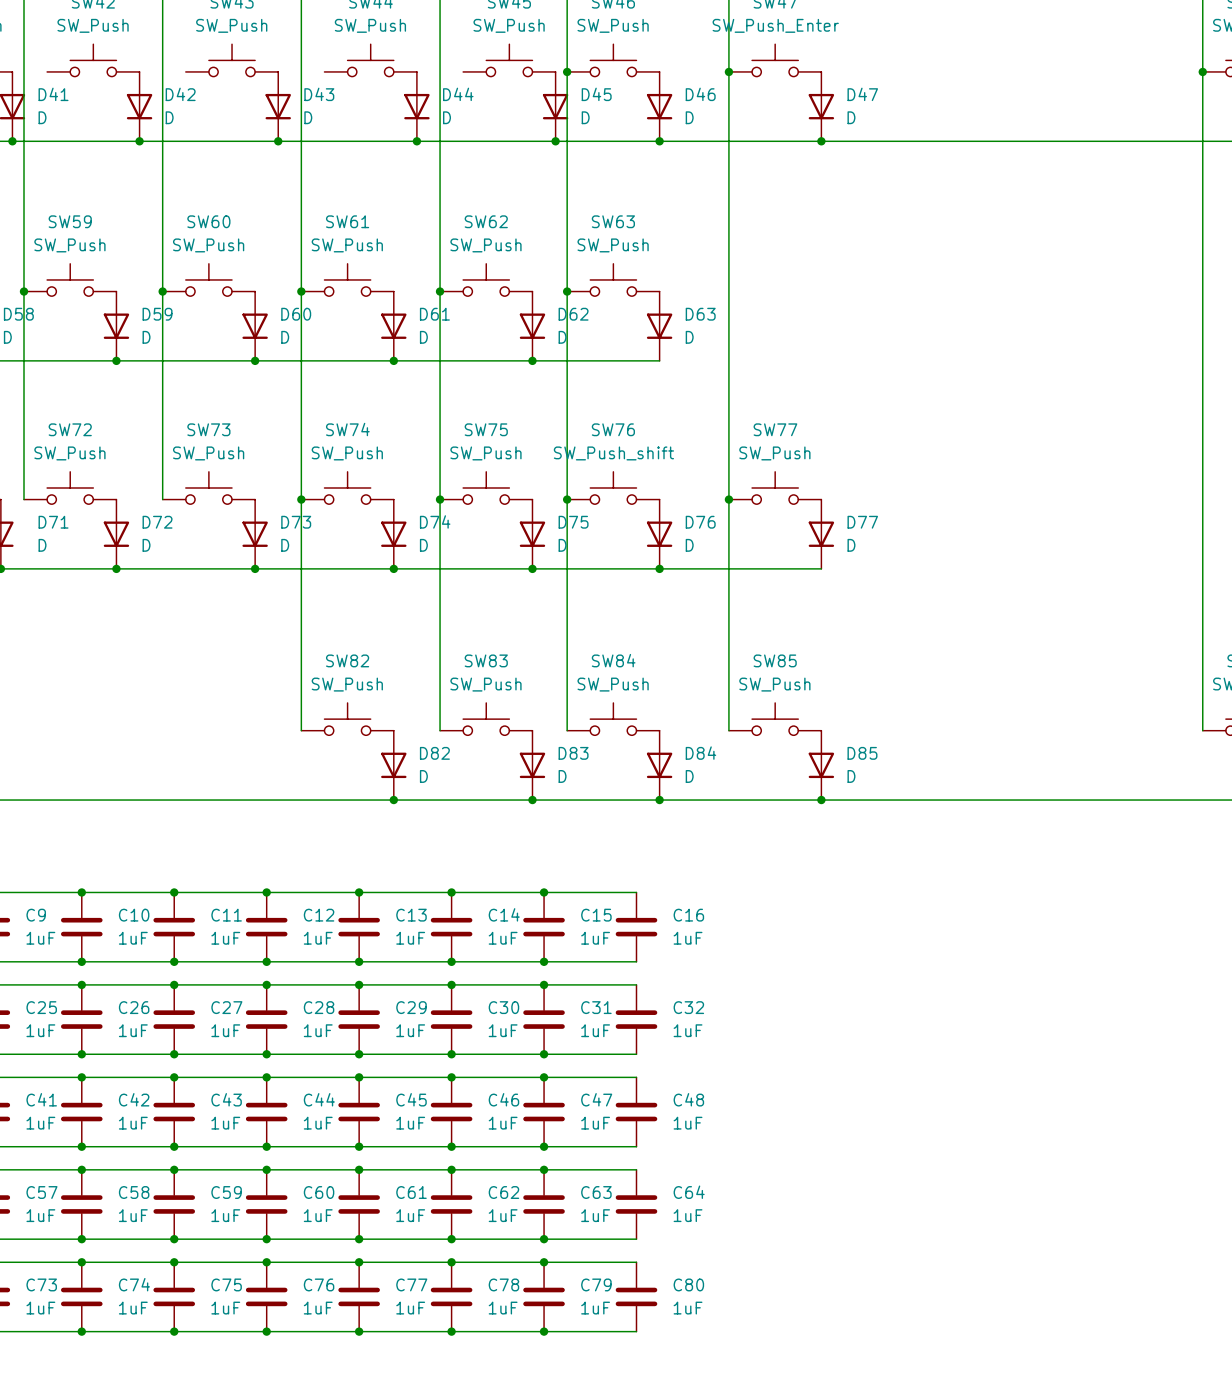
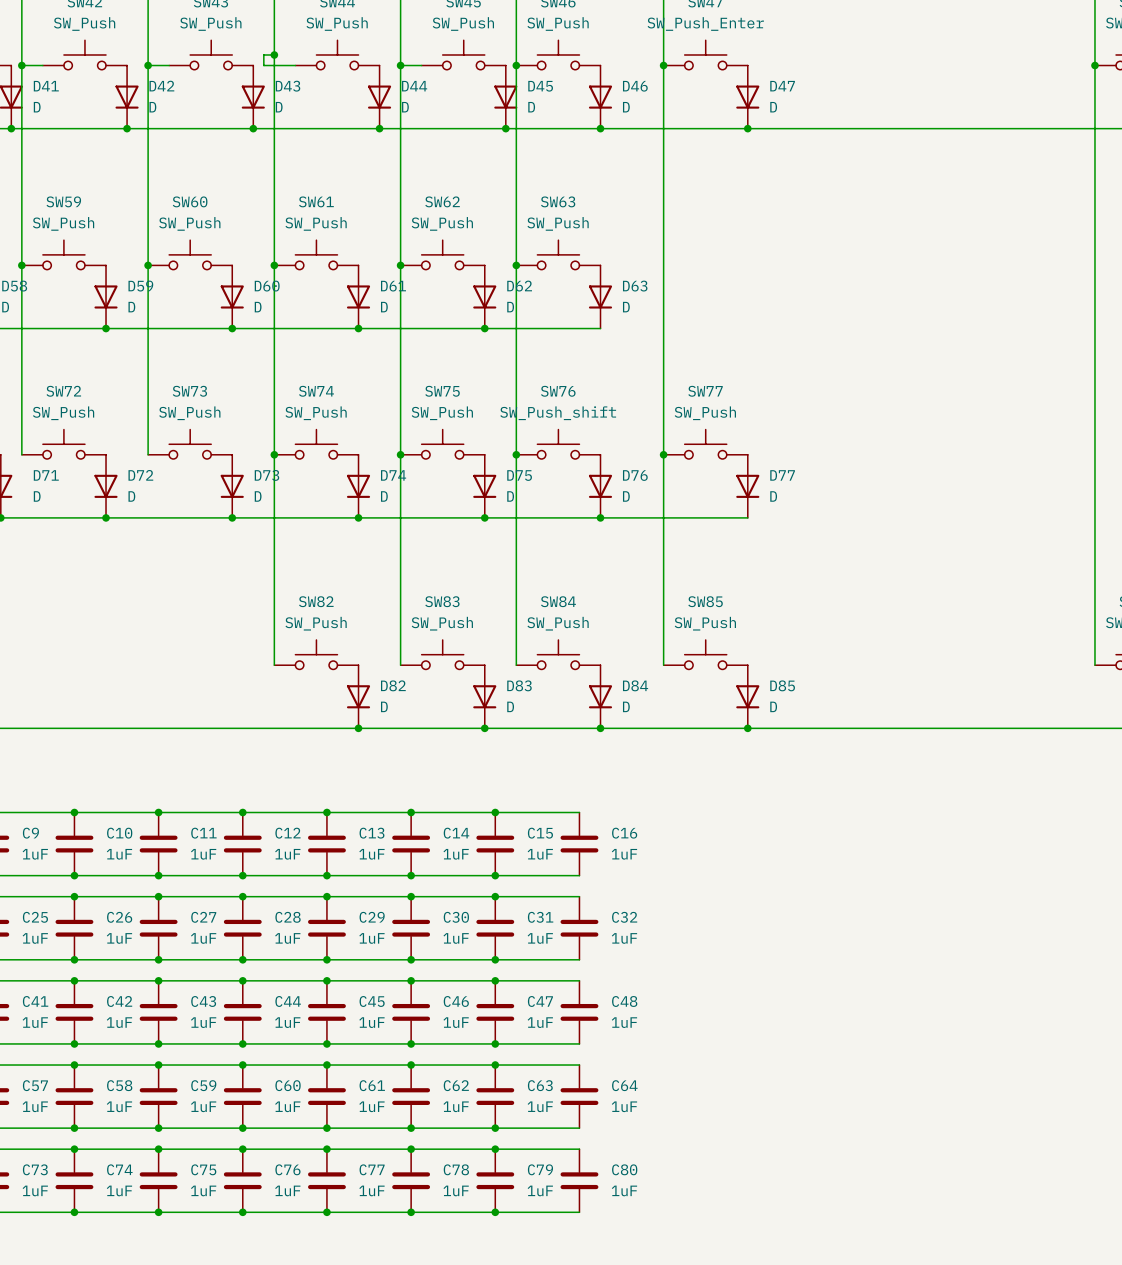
wire: none -> (274, 54) (263, 54) (263, 65) (295, 65)
junction: none -> (274, 54)
wire: none -> (21, 65) (42, 65)
junction: none -> (21, 65)
wire: none -> (148, 65) (169, 65)
junction: none -> (148, 65)
wire: none -> (400, 65) (421, 65)
junction: none -> (400, 65)

